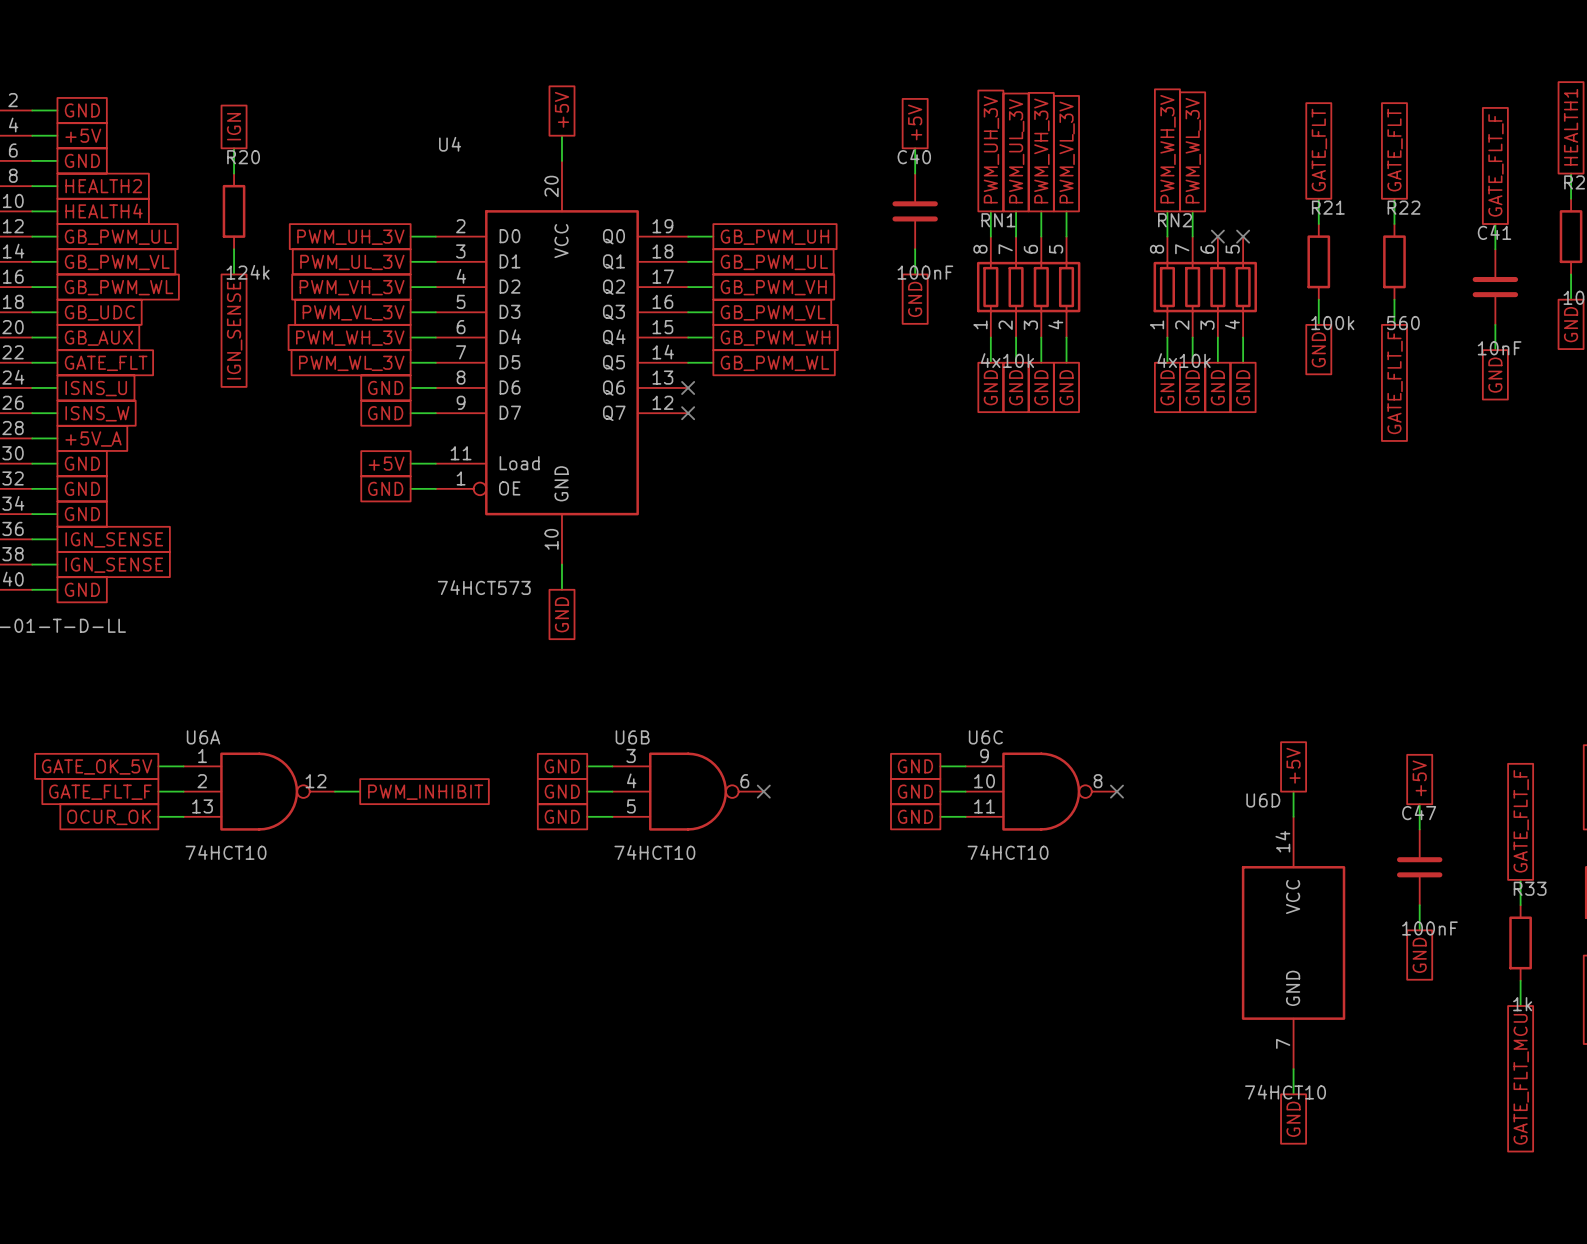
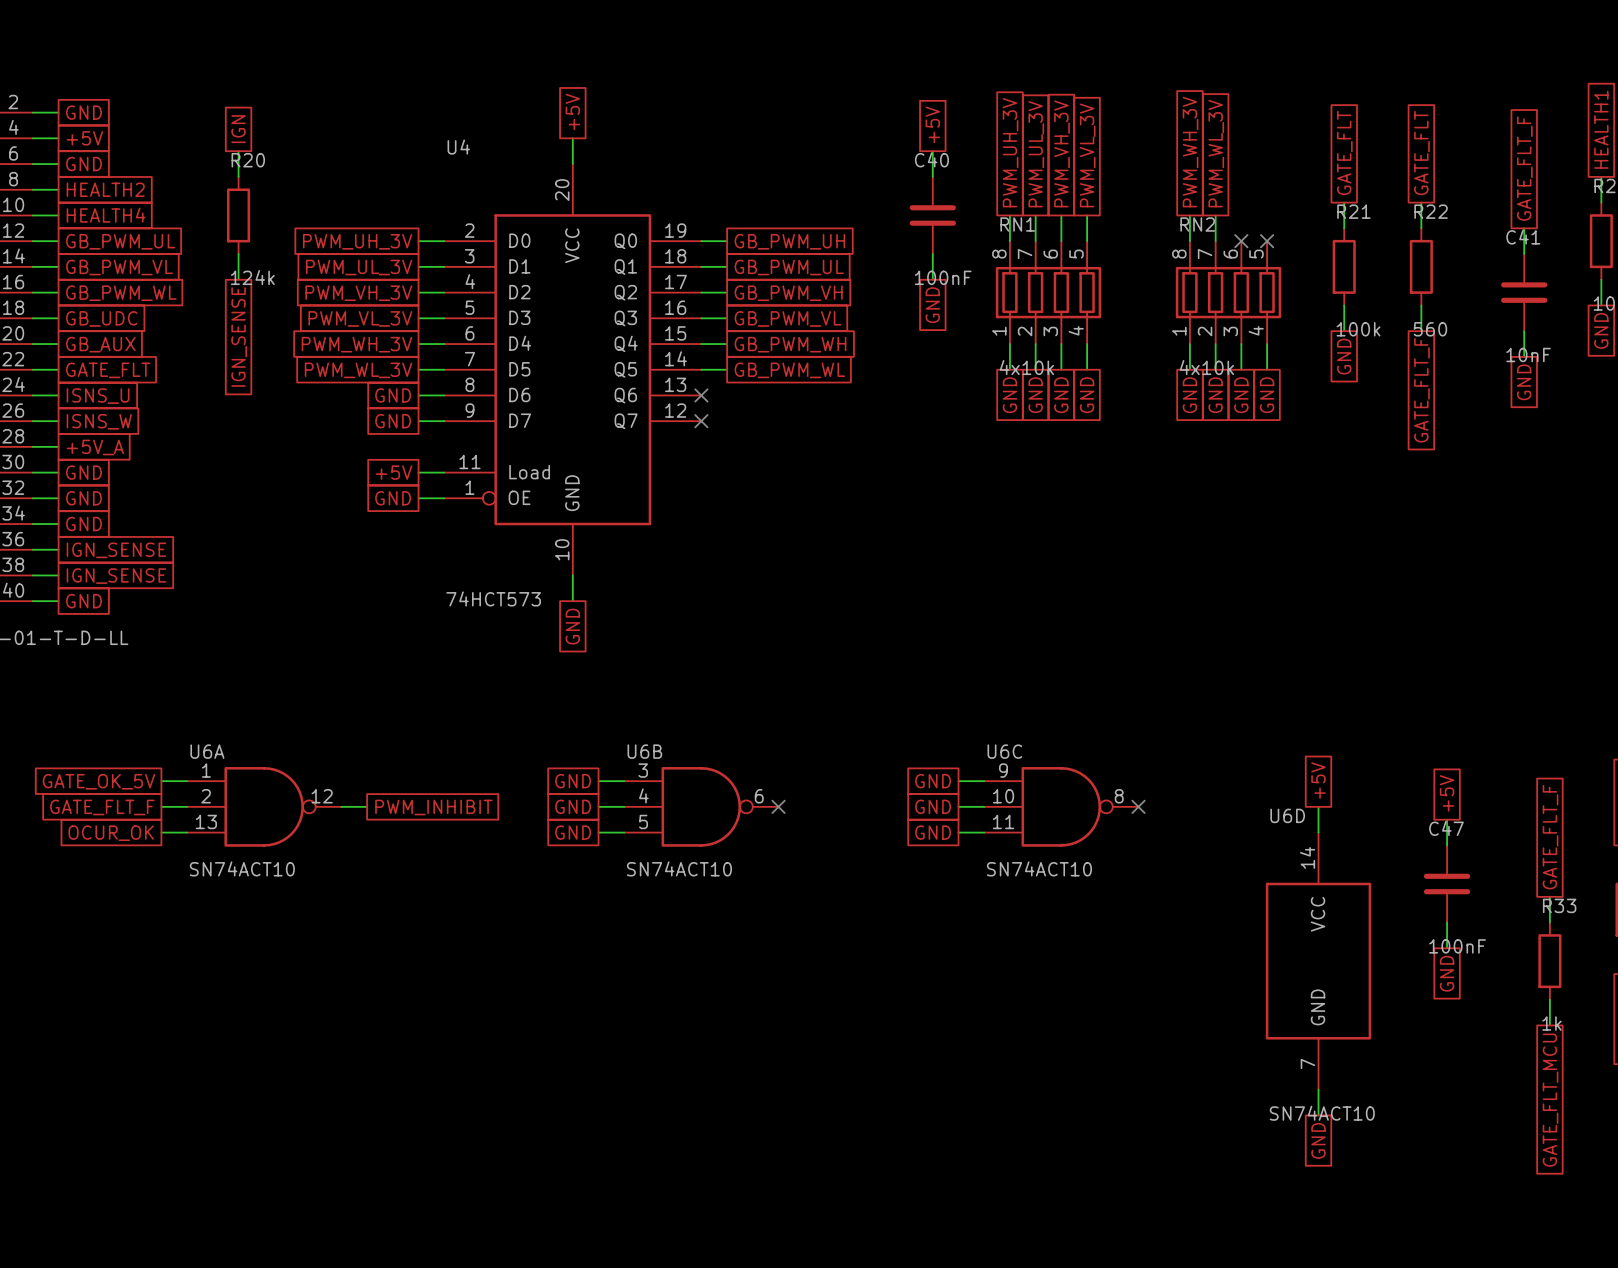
U6A value: 74HCT10 (226, 852) -> SN74ACT10 (242, 868)
U6B value: 74HCT10 (654, 852) -> SN74ACT10 (679, 868)
U6C value: 74HCT10 (1008, 852) -> SN74ACT10 (1039, 868)
U6D value: 74HCT10 (1285, 1092) -> SN74ACT10 (1322, 1113)

